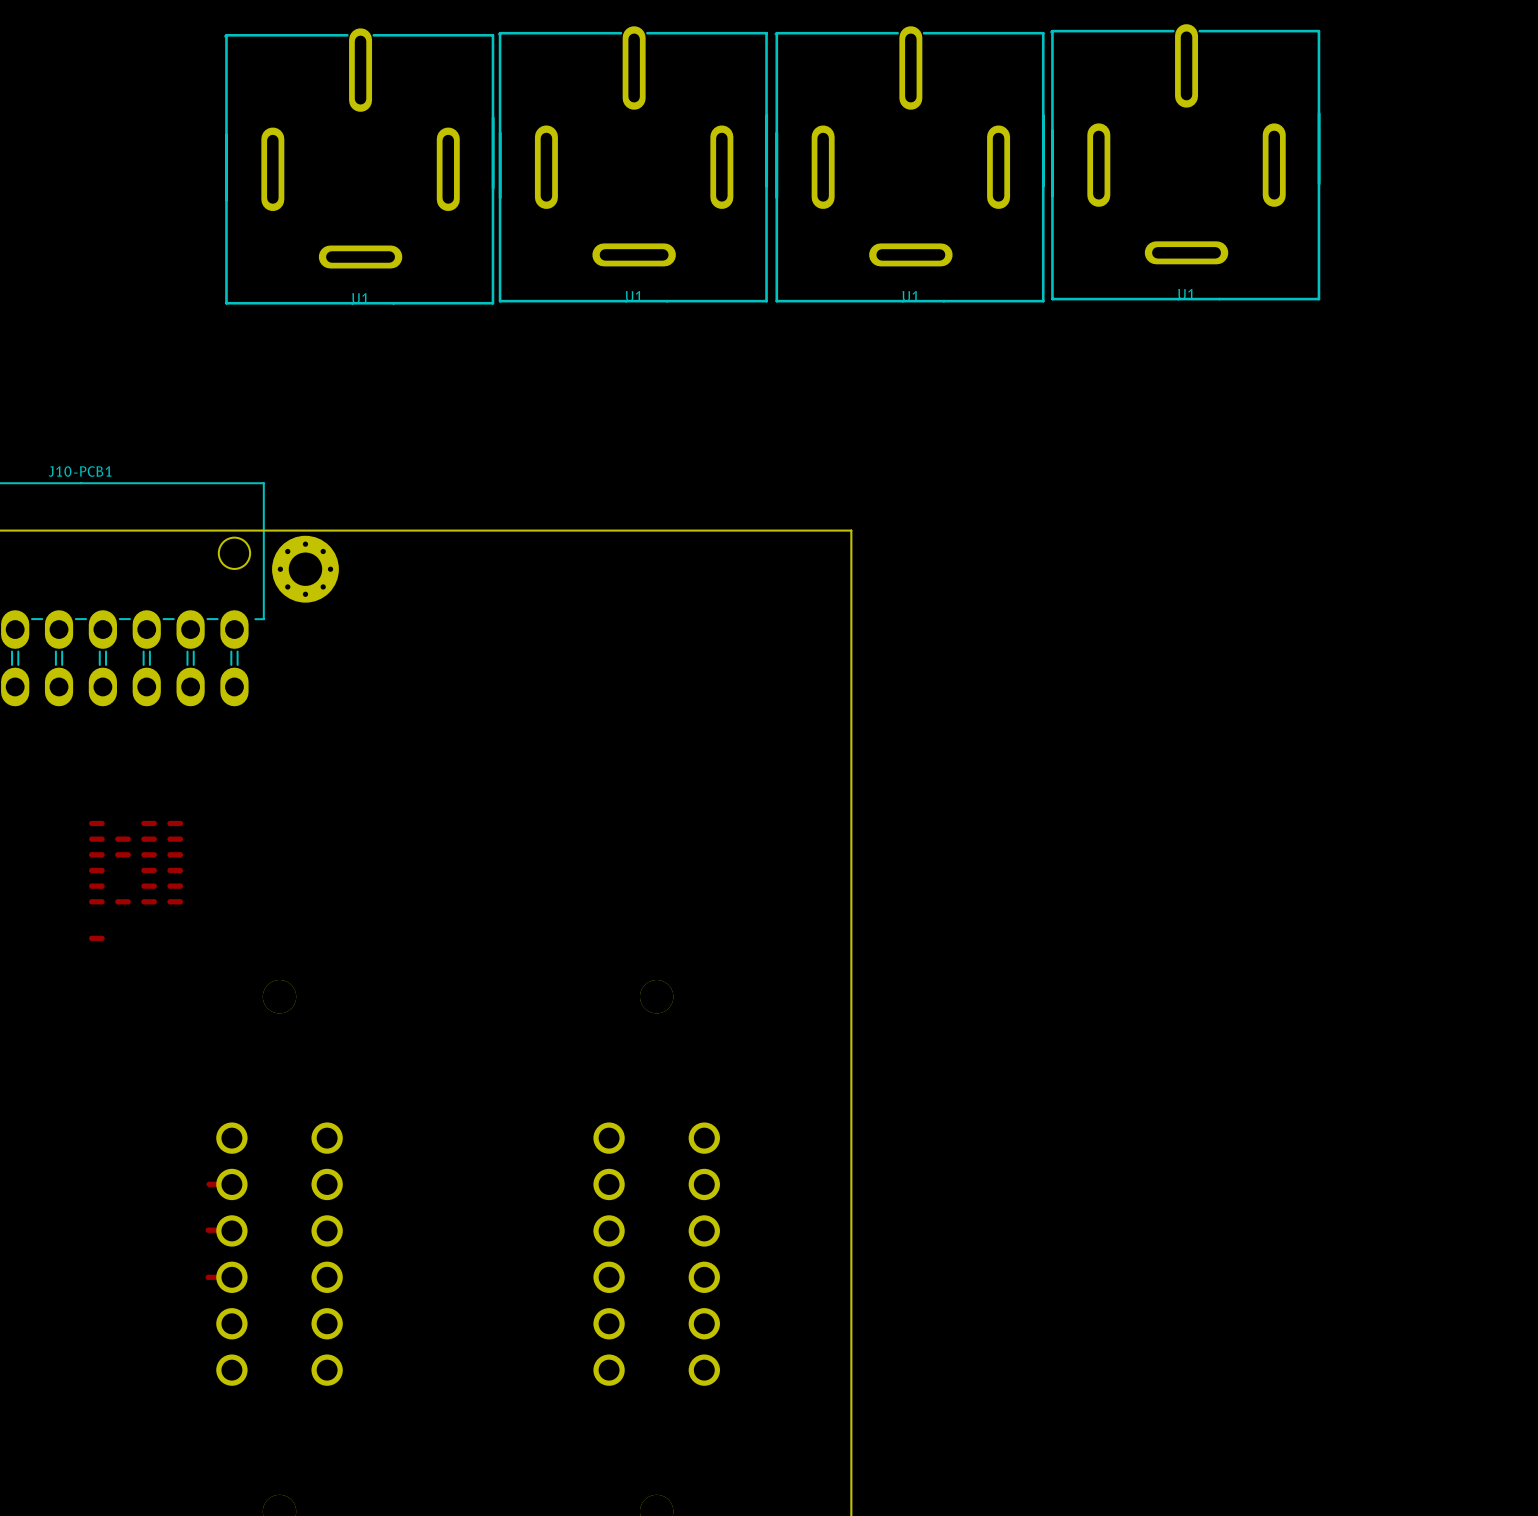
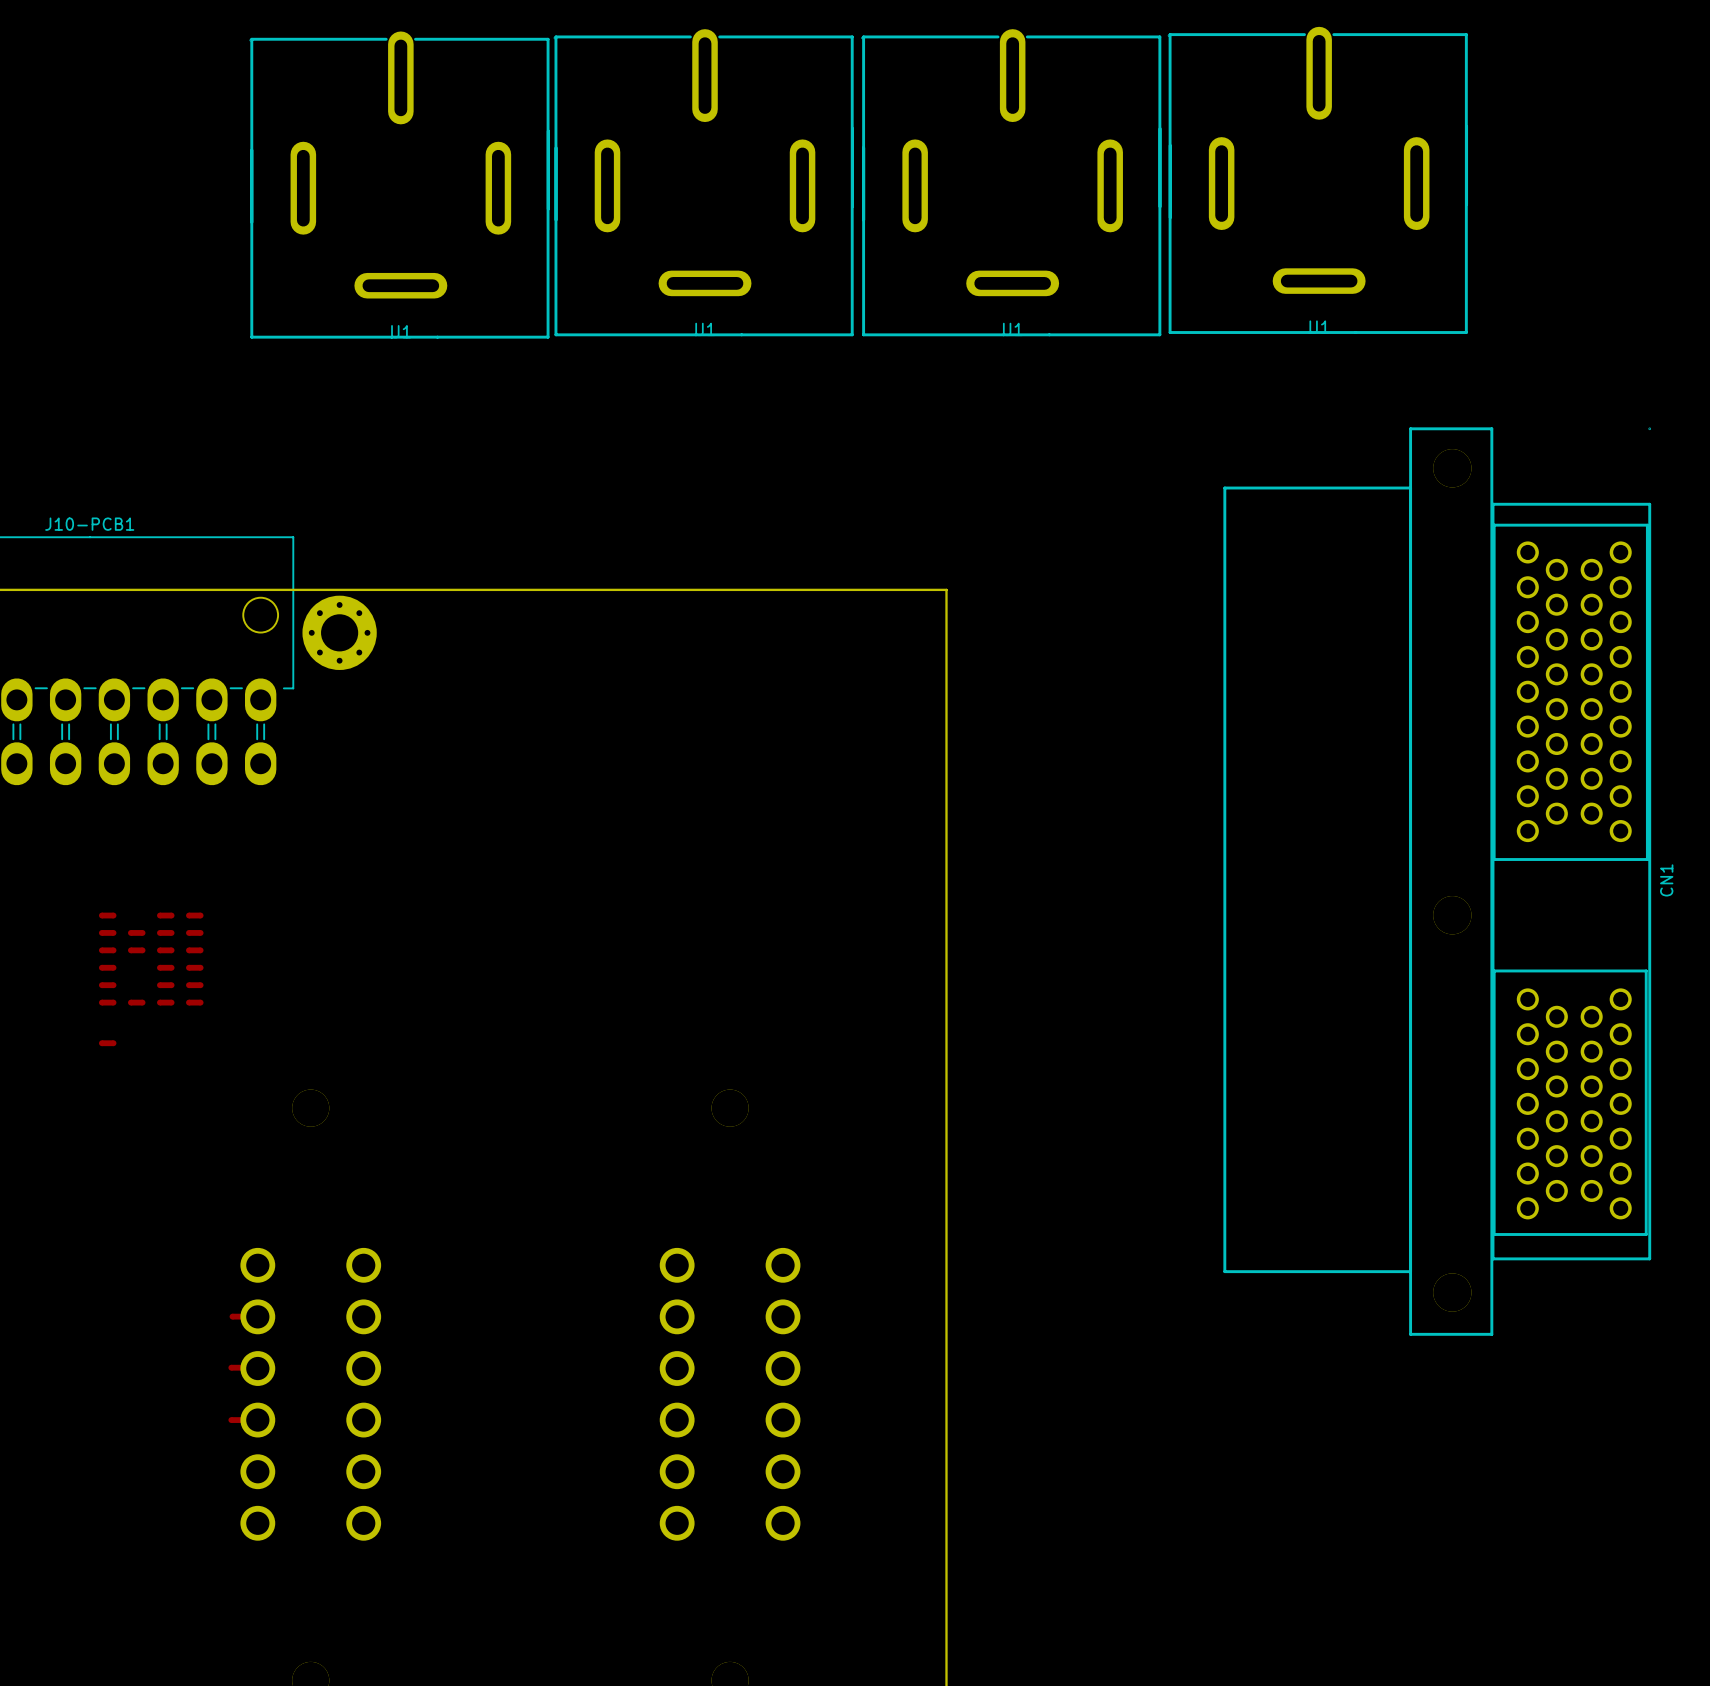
CN1: none -> (1437, 881)

